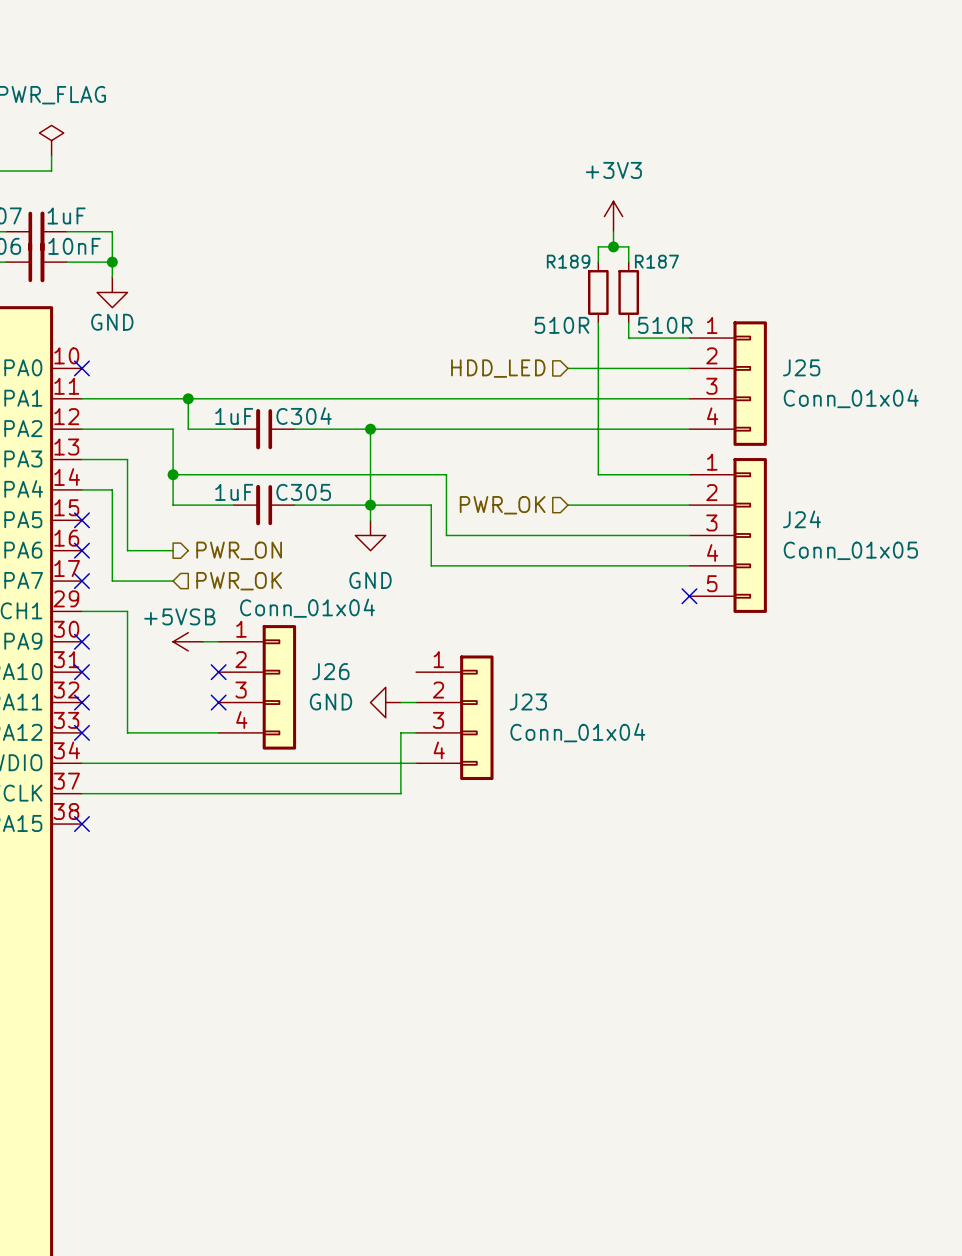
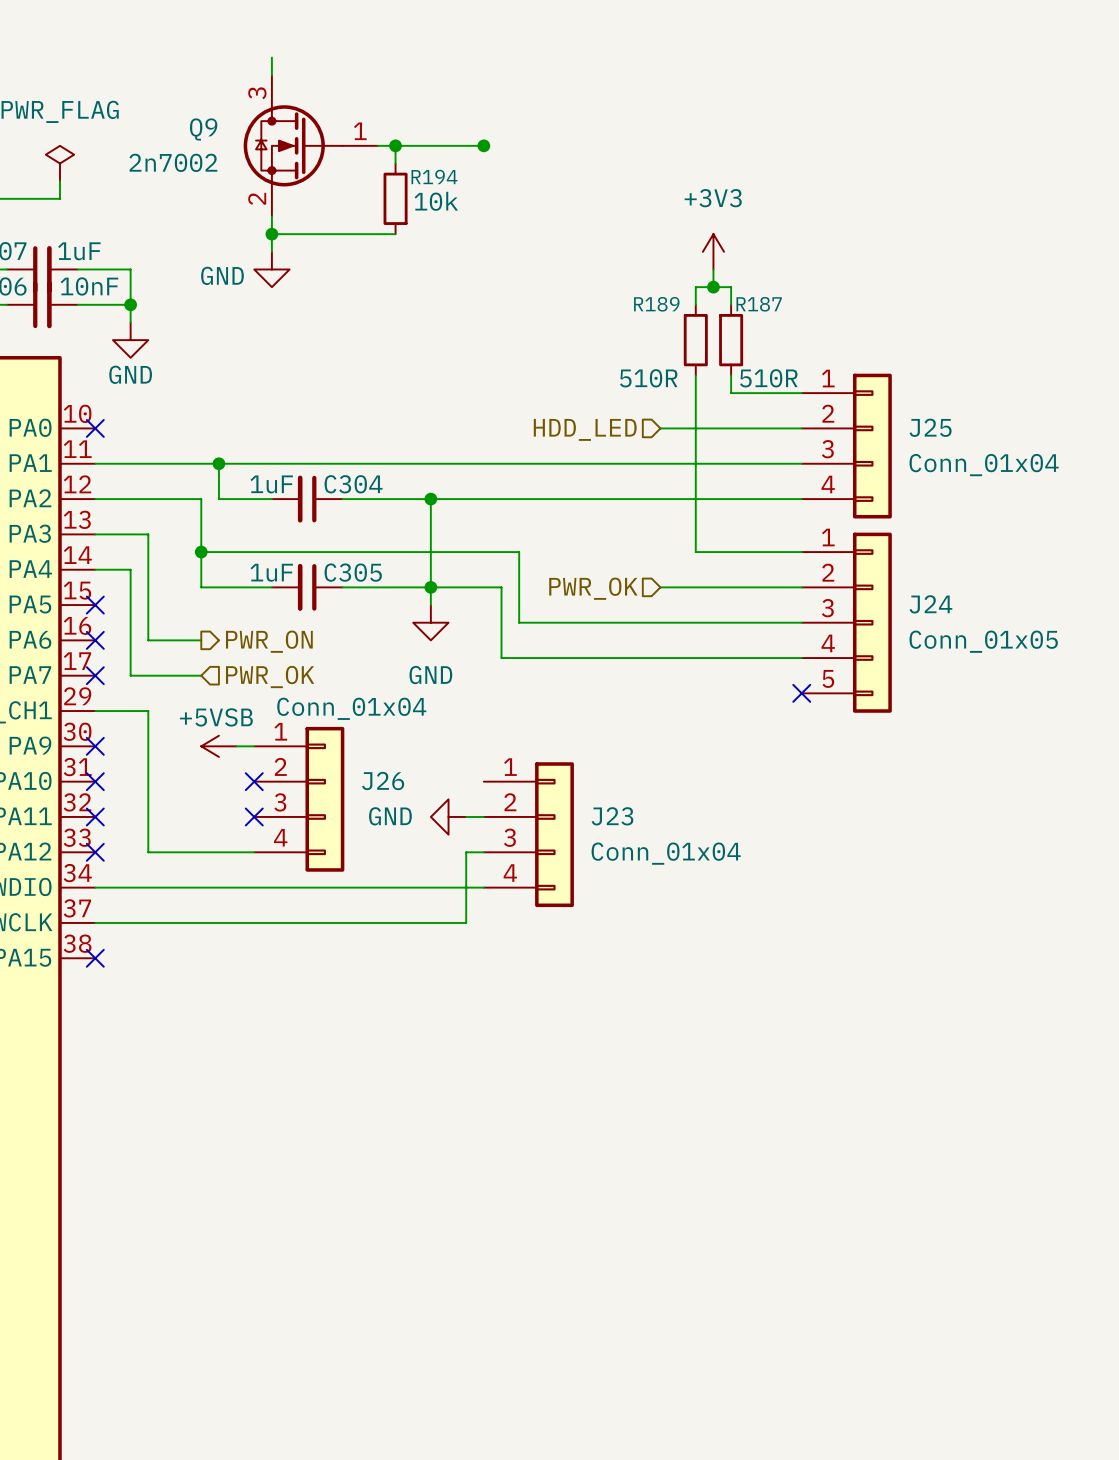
wire: none -> (271, 57) (271, 75)
Q9: none -> 2n7002 (310, 145)
wire: none -> (377, 145) (483, 145)
wire: none -> (395, 145) (395, 163)
junction: none -> (395, 145)
junction: none -> (483, 145)
R194: none -> 10k (395, 198)
wire: none -> (271, 216) (271, 251)
wire: none -> (271, 234) (395, 234)
junction: none -> (271, 234)
power symbol: none -> GND (271, 269)

